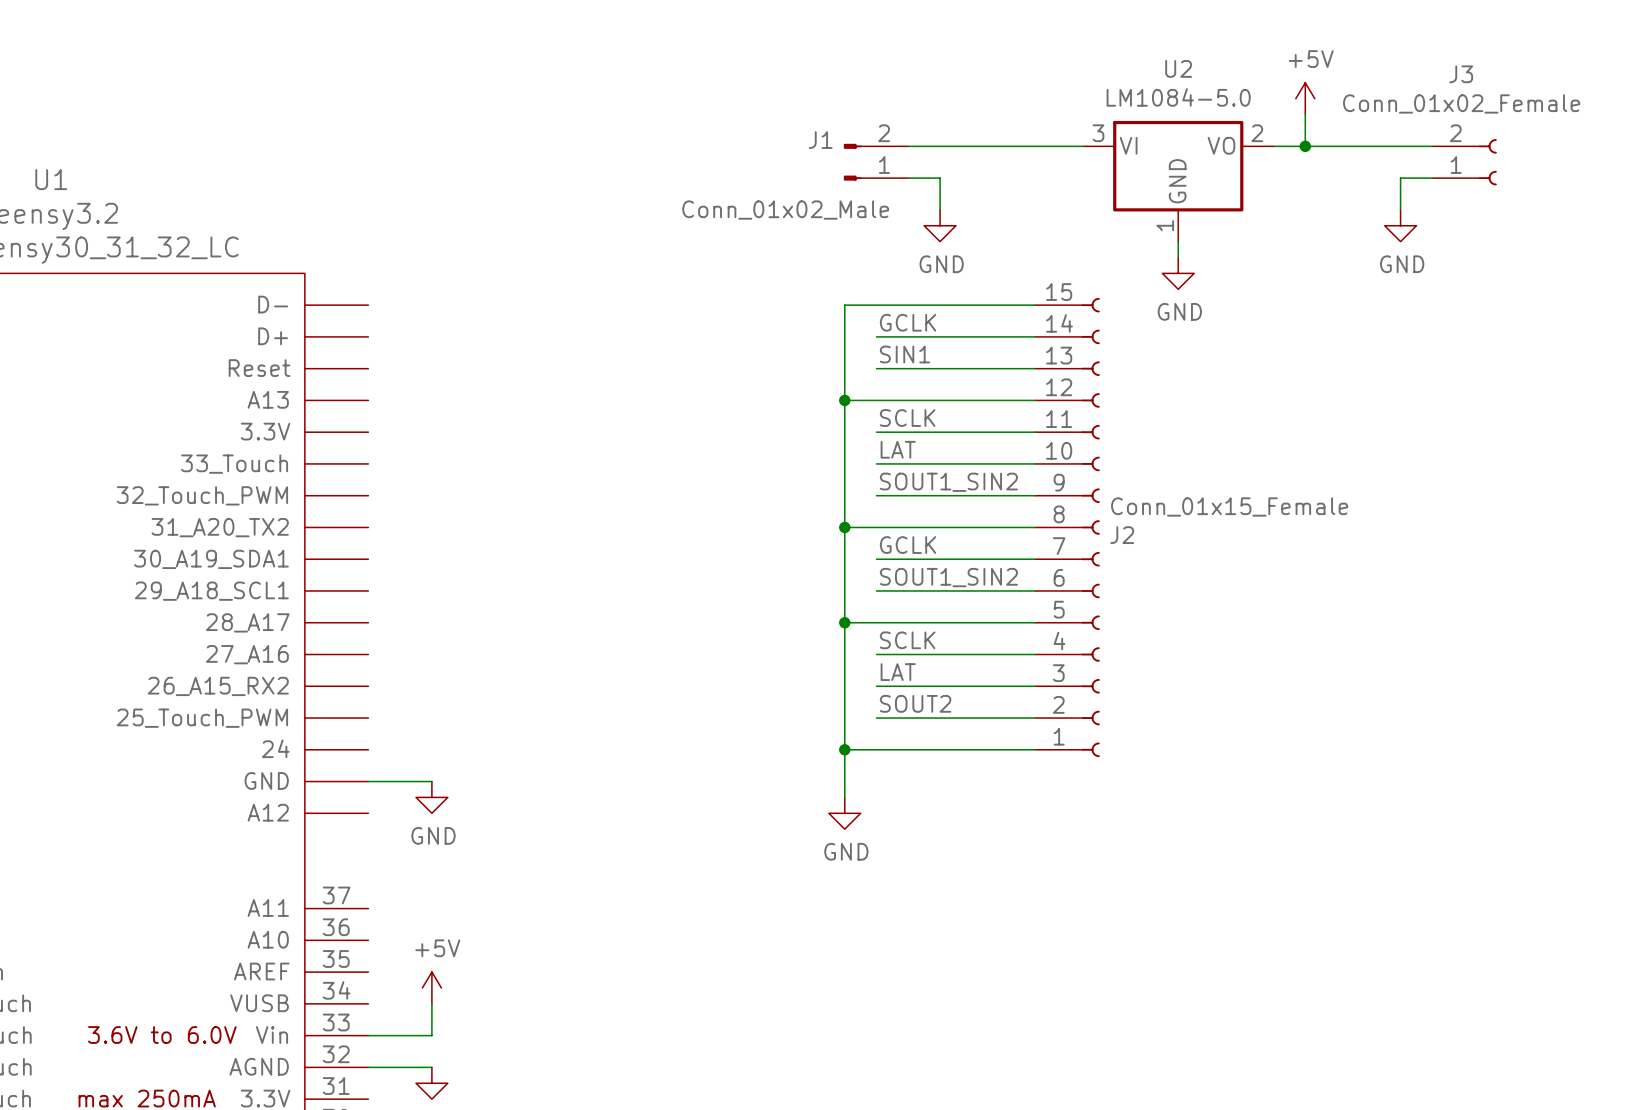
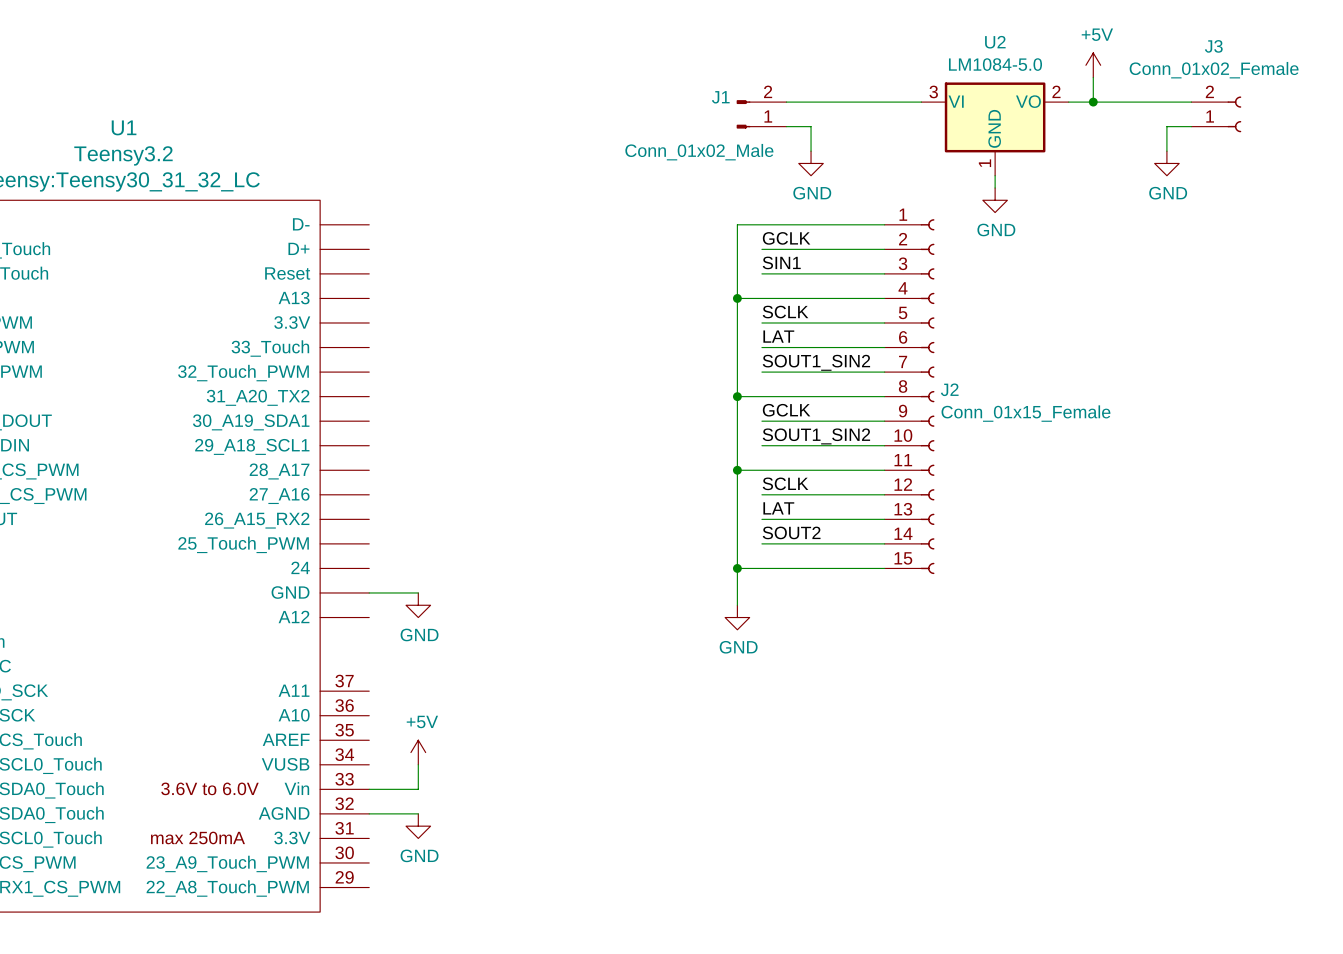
J2 flip: as is (1090, 527) -> up-down (927, 396)

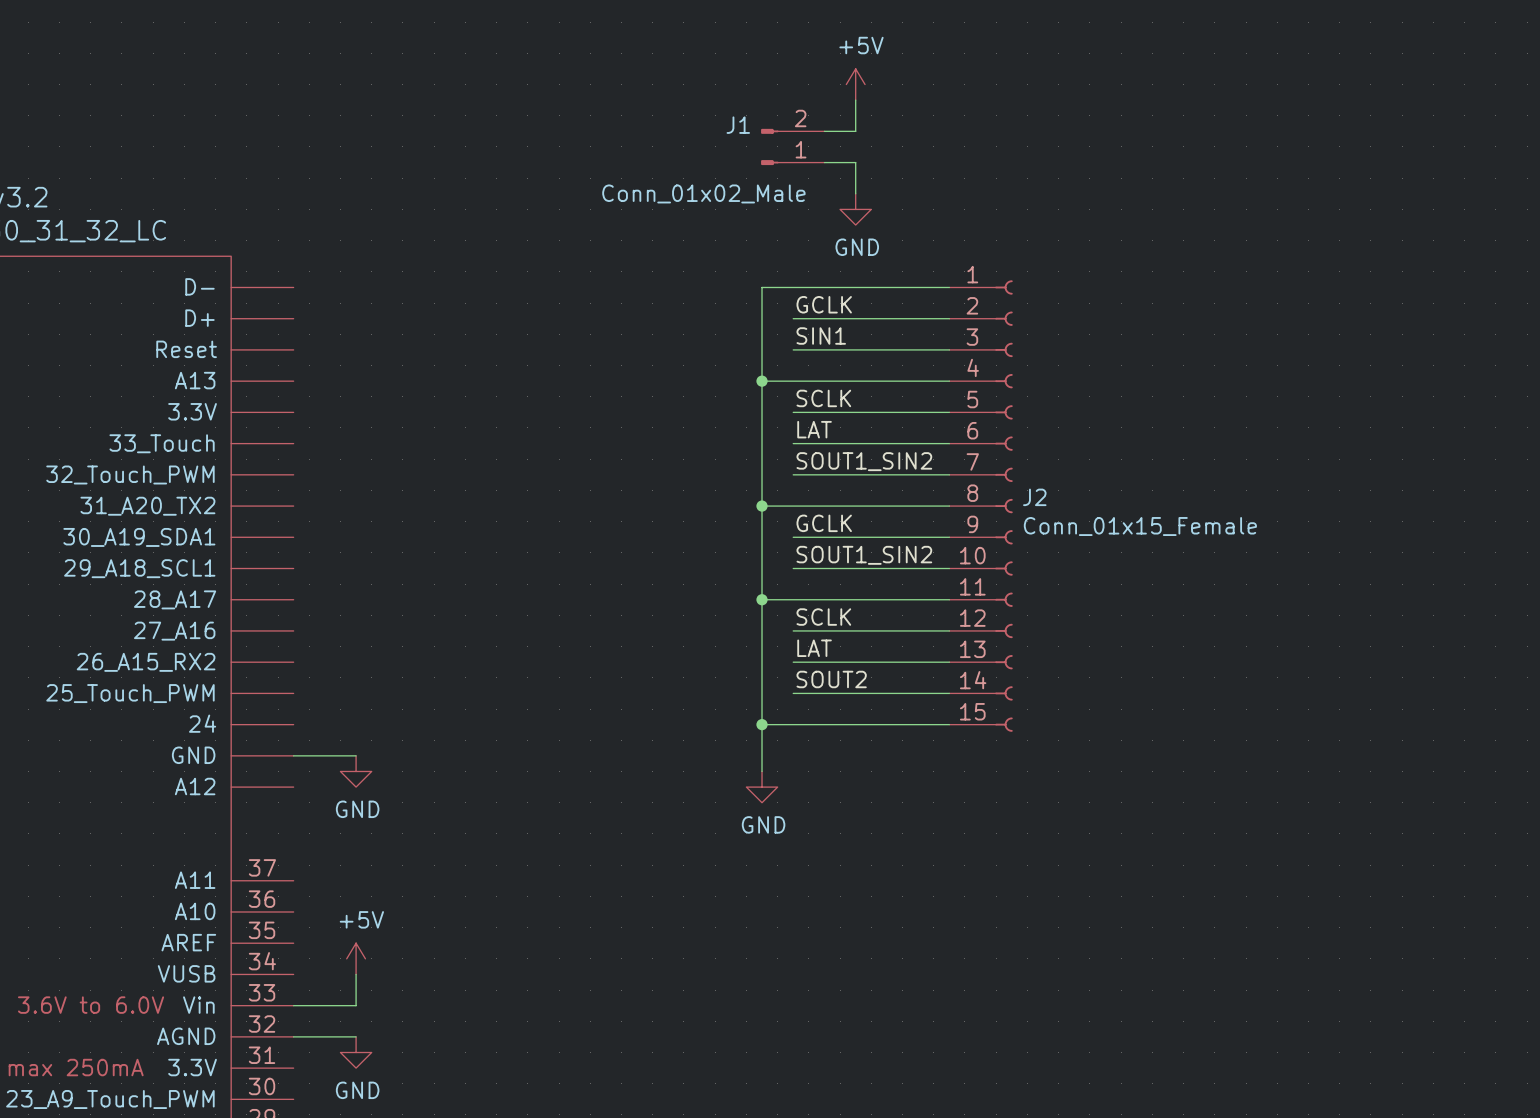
power symbol: none -> +5V (855, 84)
power symbol: +5V (1093, 65) -> none
wire: (1093, 77) (1093, 102) -> none
wire: (811, 102) (921, 102) -> (855, 131) (855, 100)
wire: (1068, 102) (1191, 102) -> none
junction: (1093, 102) -> none
J3: Conn_01x02_Female (1216, 114) -> none
wire: (1191, 126) (1166, 126) (1166, 151) -> none
U2: LM1084-5.0 (995, 129) -> none
power symbol: GND (1166, 163) -> none
wire: (995, 175) (995, 187) -> none
power symbol: GND (995, 200) -> none

